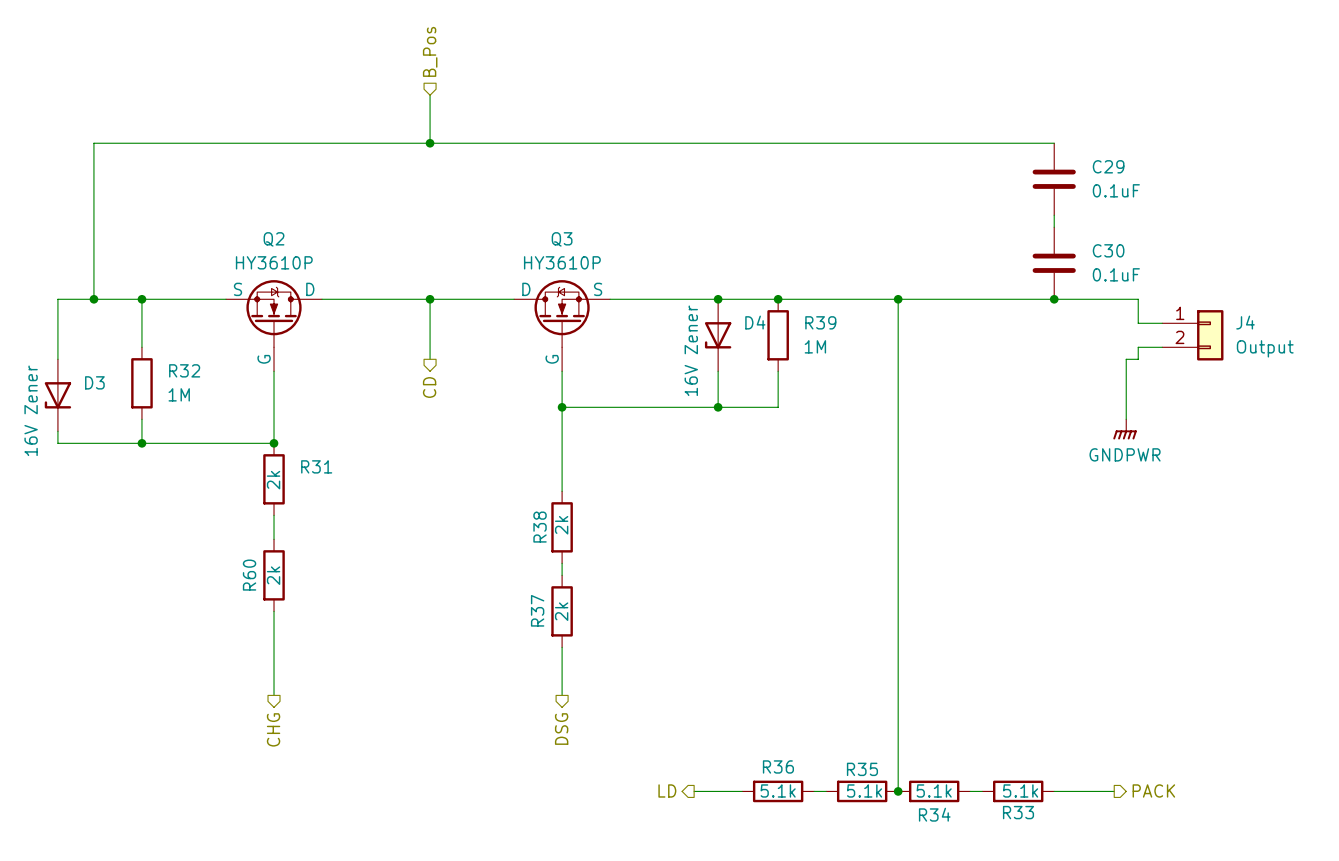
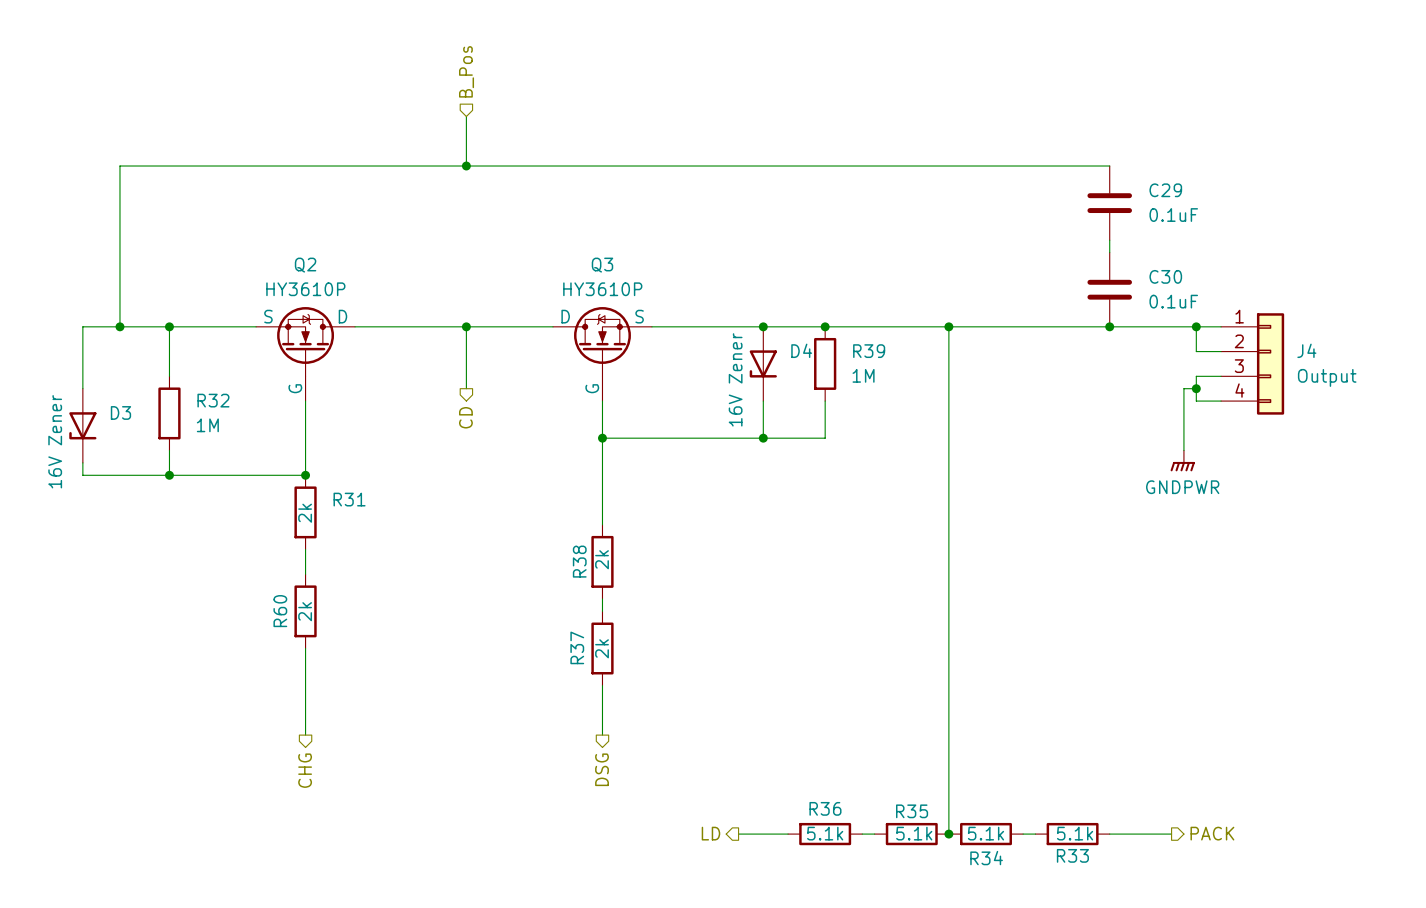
wire: none -> (1196, 326) (1221, 326)
junction: none -> (1196, 326)
J4 symbol: [1162, 310, 1224, 361] -> [1221, 313, 1285, 415]
wire: none -> (1196, 388) (1196, 401) (1221, 401)
junction: none -> (1196, 388)

